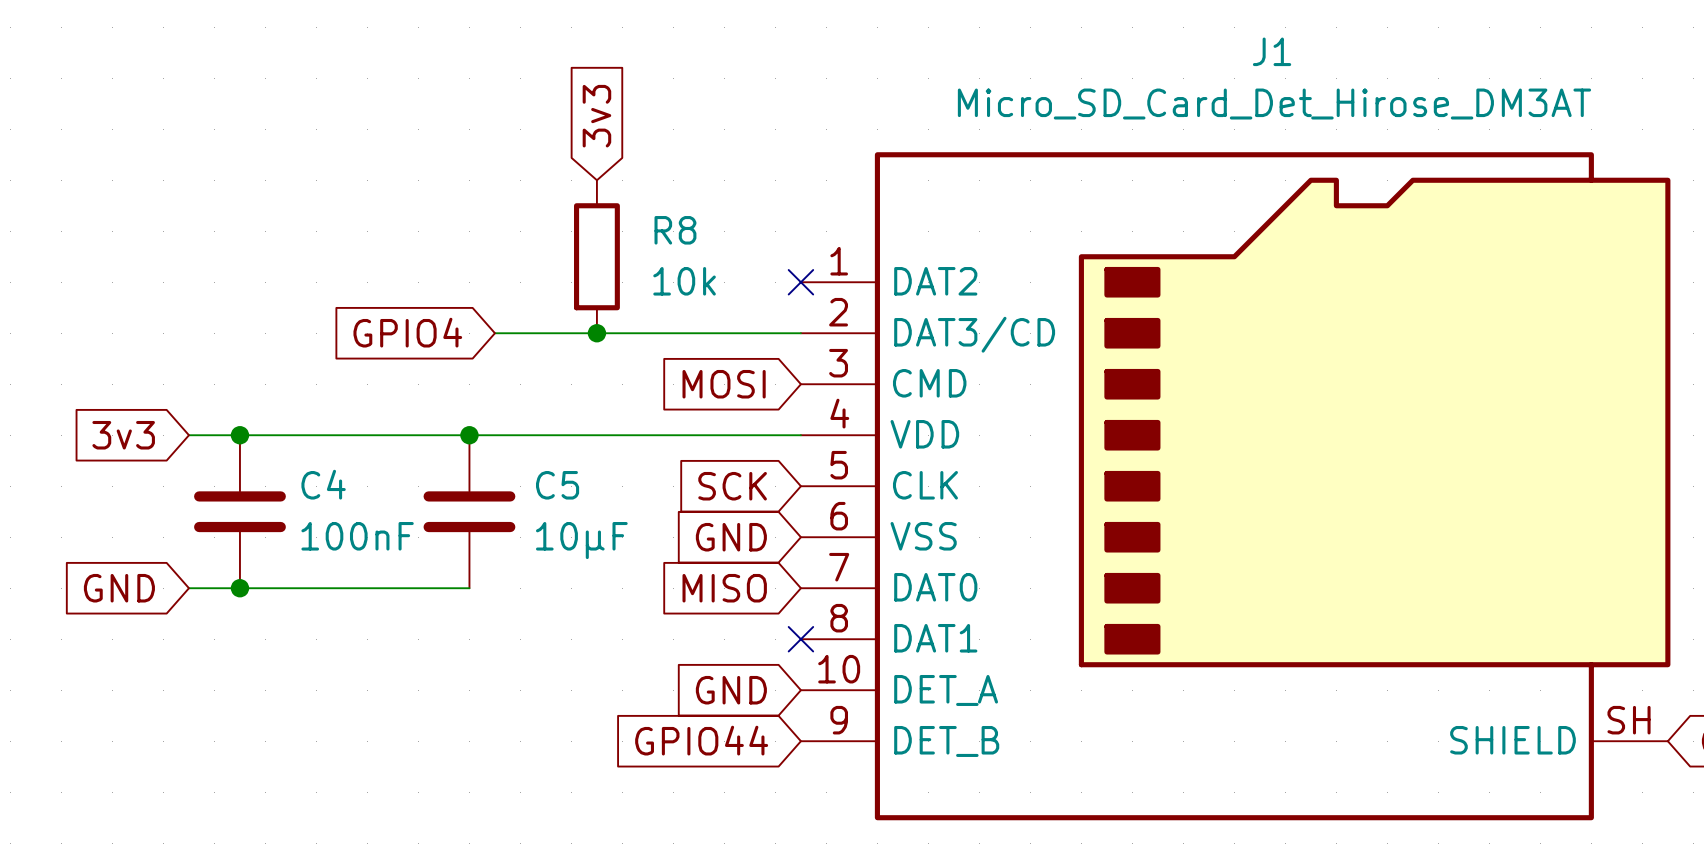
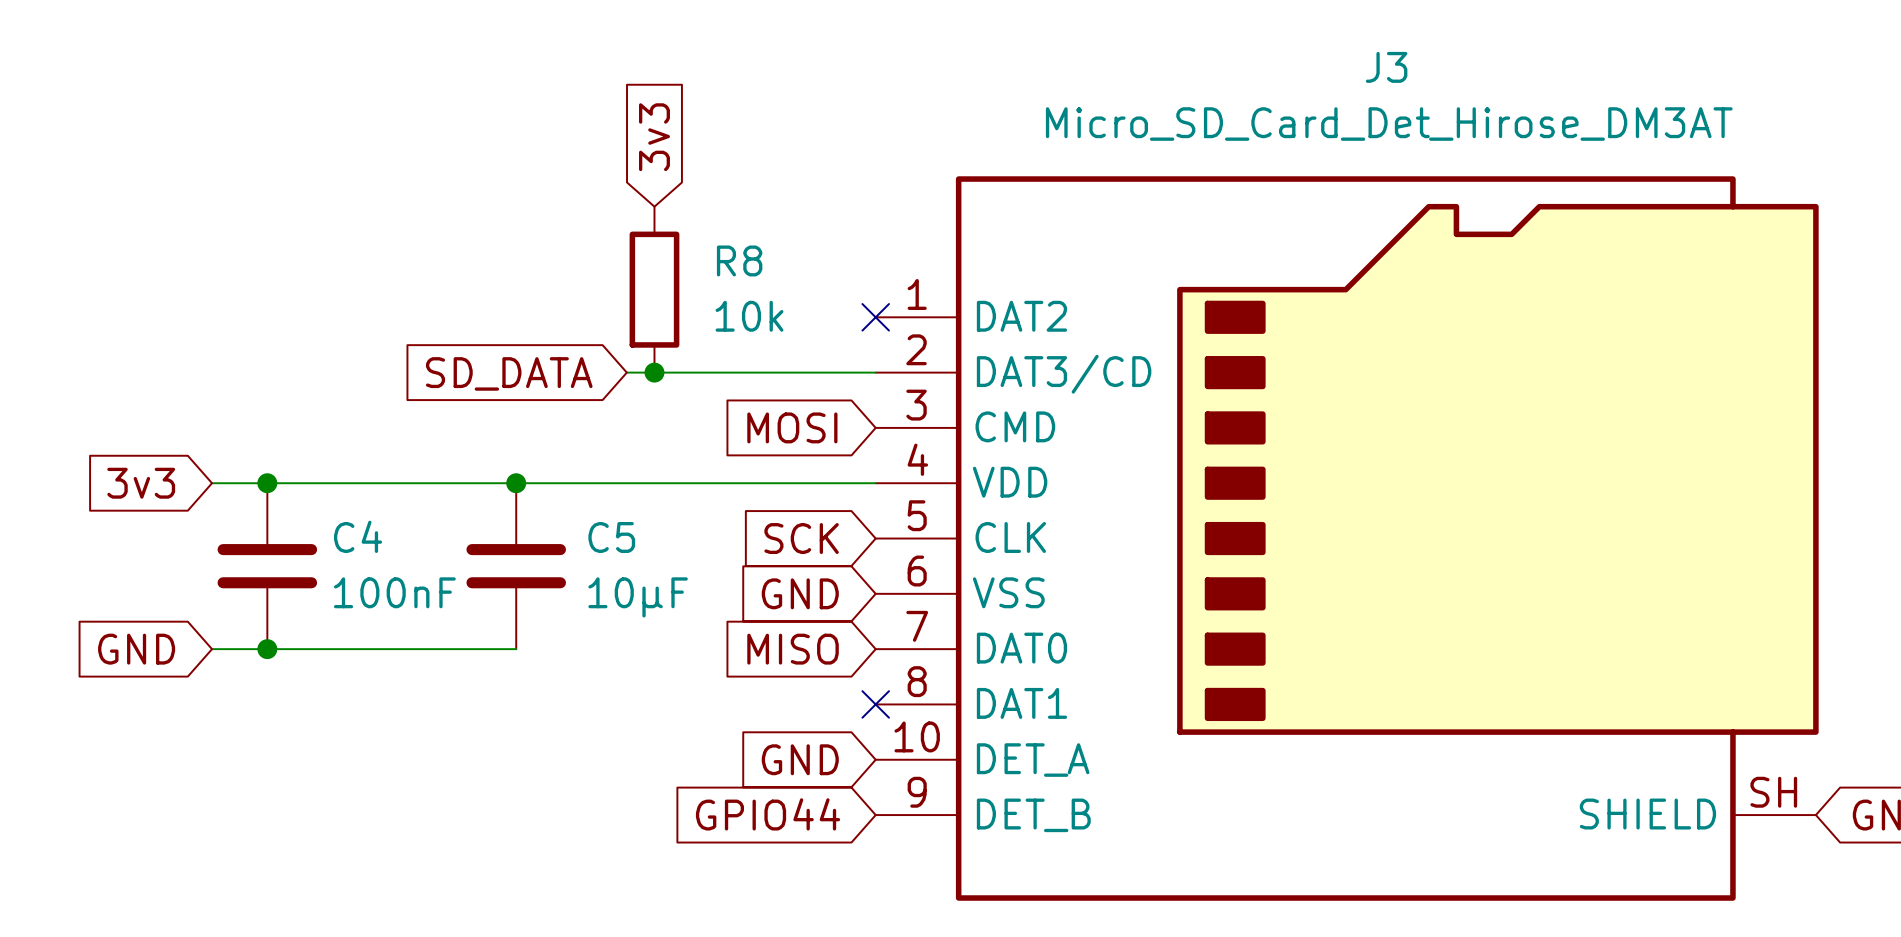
J1 name: J1 (1272, 51) -> J3 (1386, 67)
global label: GPIO4 (407, 332) -> none
wire: (494, 333) (571, 333) -> none
global label: none -> SD_DATA (509, 373)

